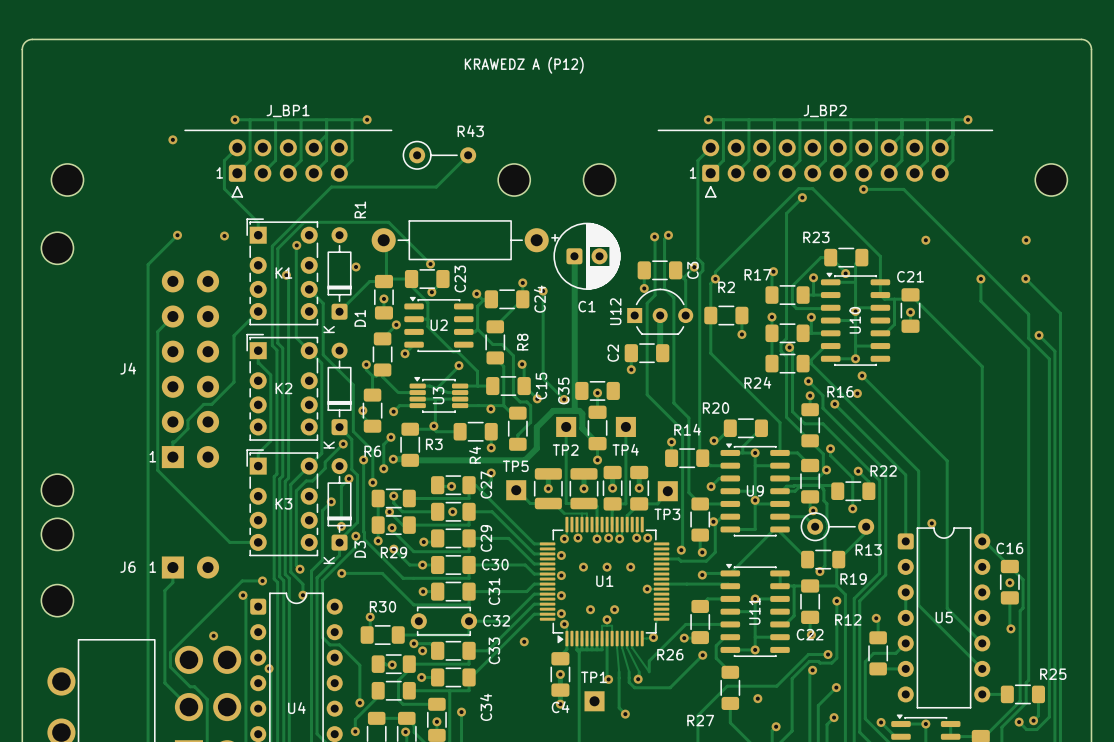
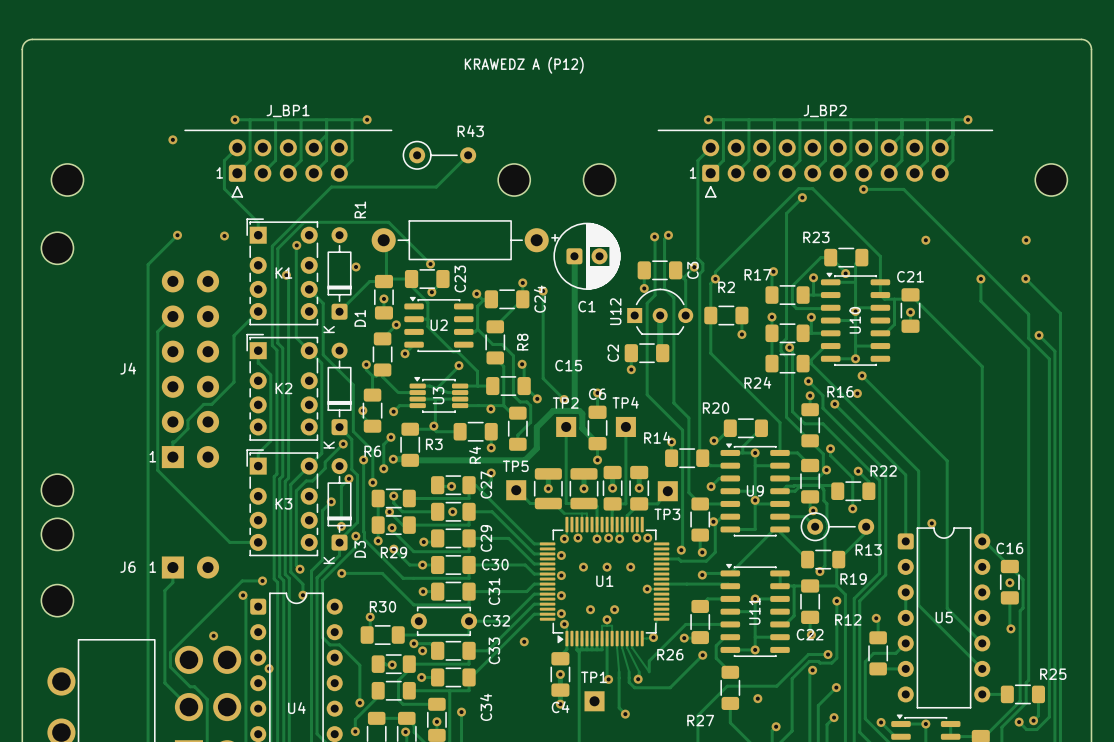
C15 name rotation: 0° (541, 386) -> 90° clockwise (568, 365)
C35: (597, 390) -> none
C6 name: none -> C6 (597, 394)
R14 name position: R14 (687, 429) -> R14 (657, 437)
TP4 name position: TP4 (625, 449) -> TP4 (625, 402)
TP2 name position: TP2 (565, 450) -> TP2 (565, 403)

